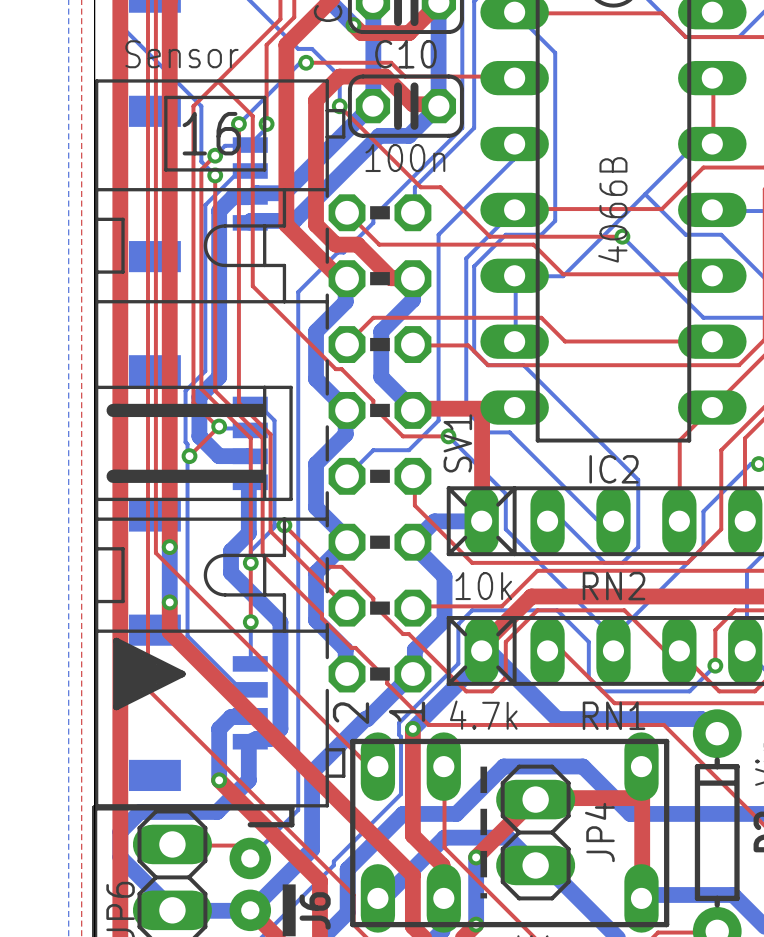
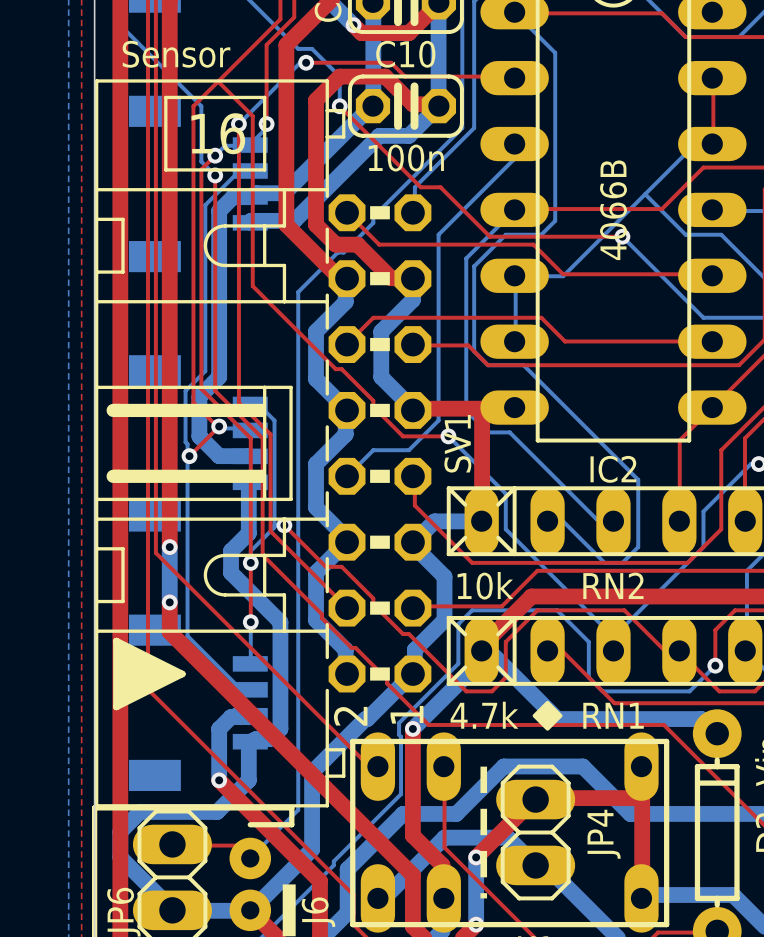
drawing: none -> [532, 700, 563, 731]

